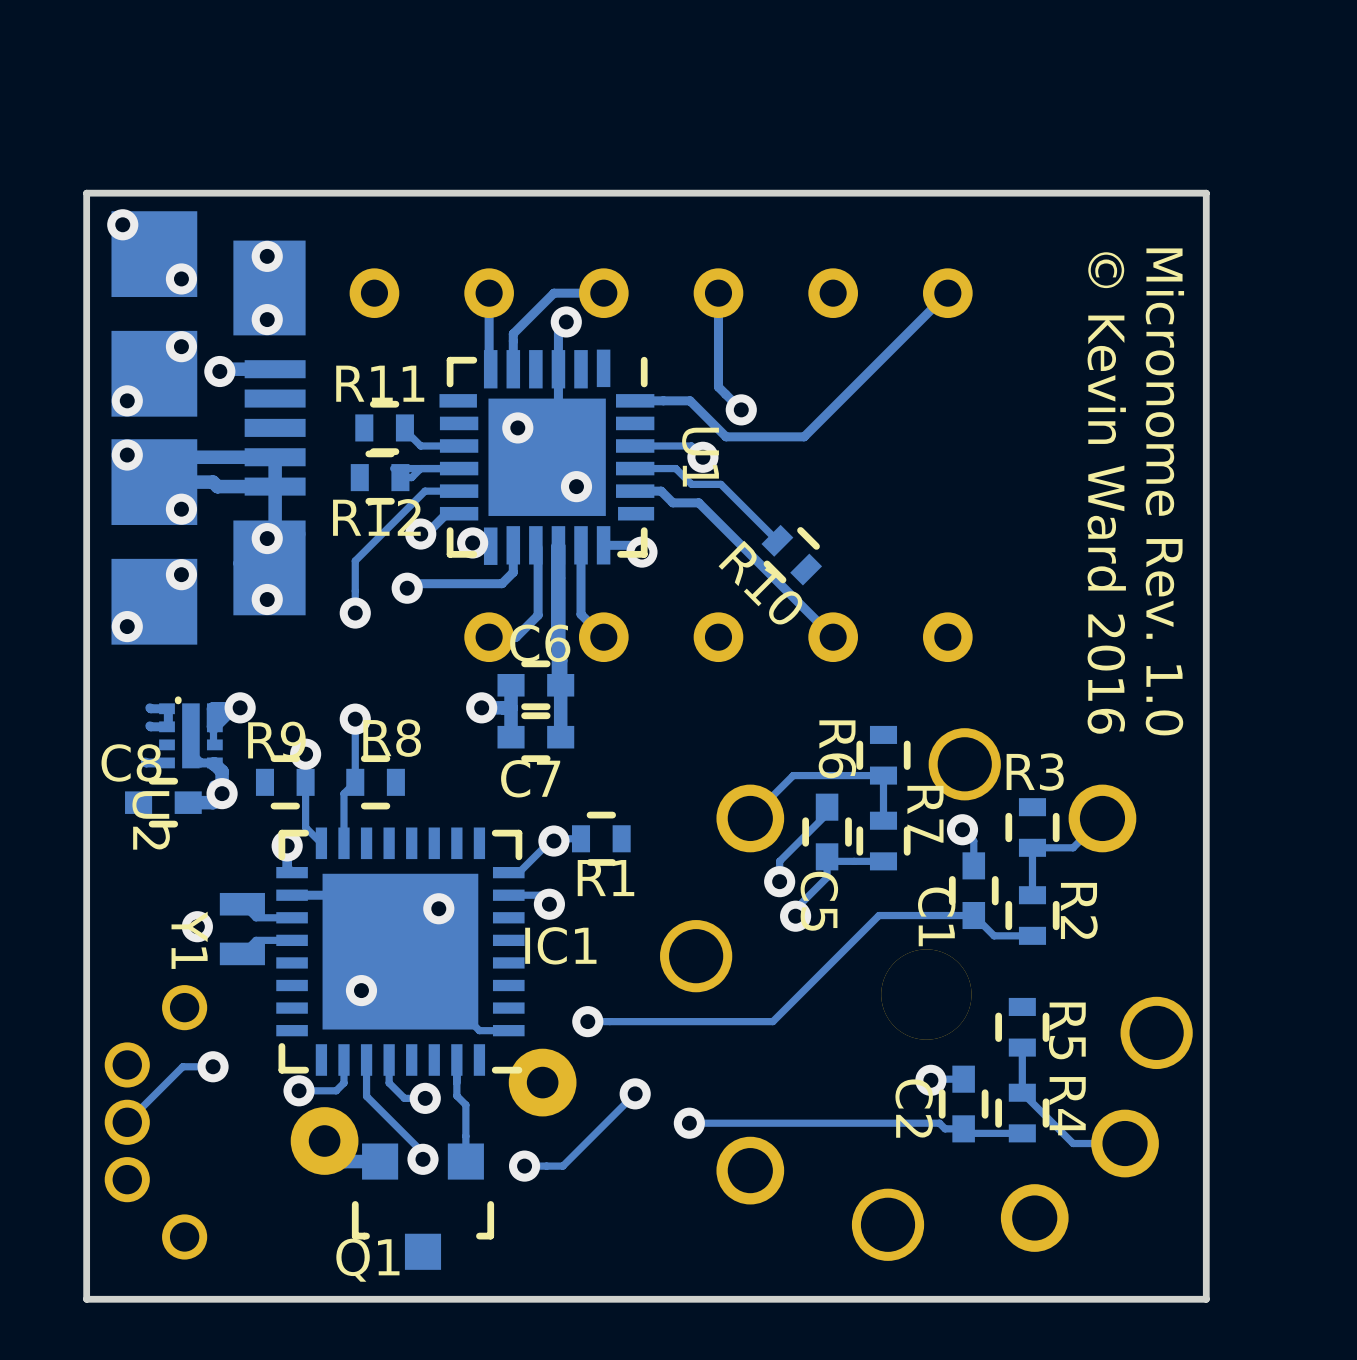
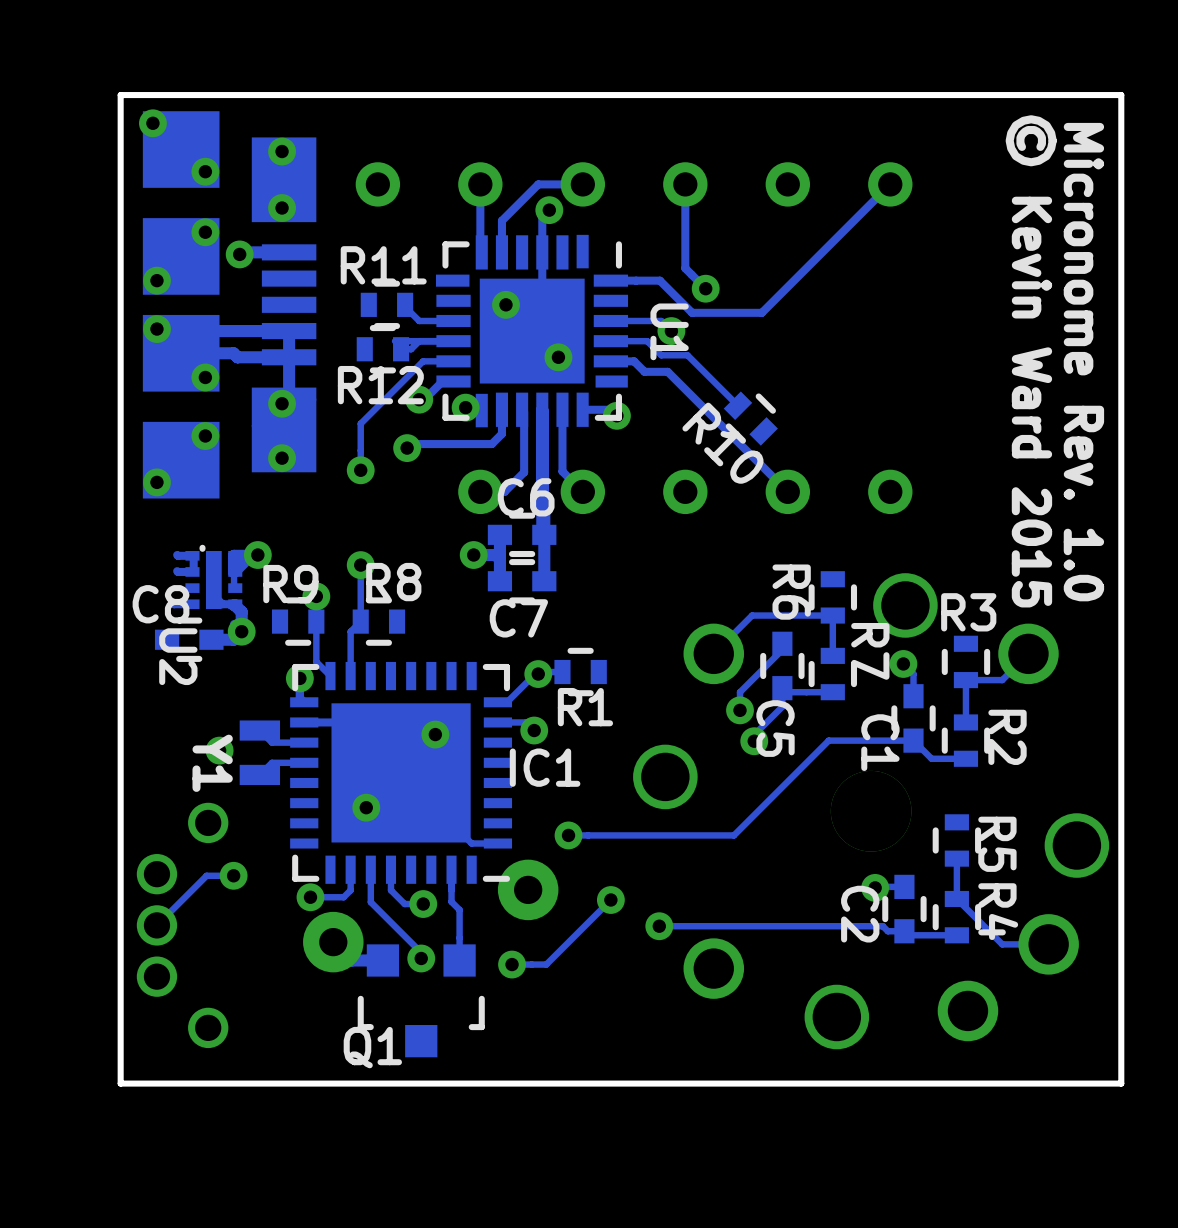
text: © Kevin Ward 2016 (1106, 493) -> © Kevin Ward 2015 (1031, 361)

